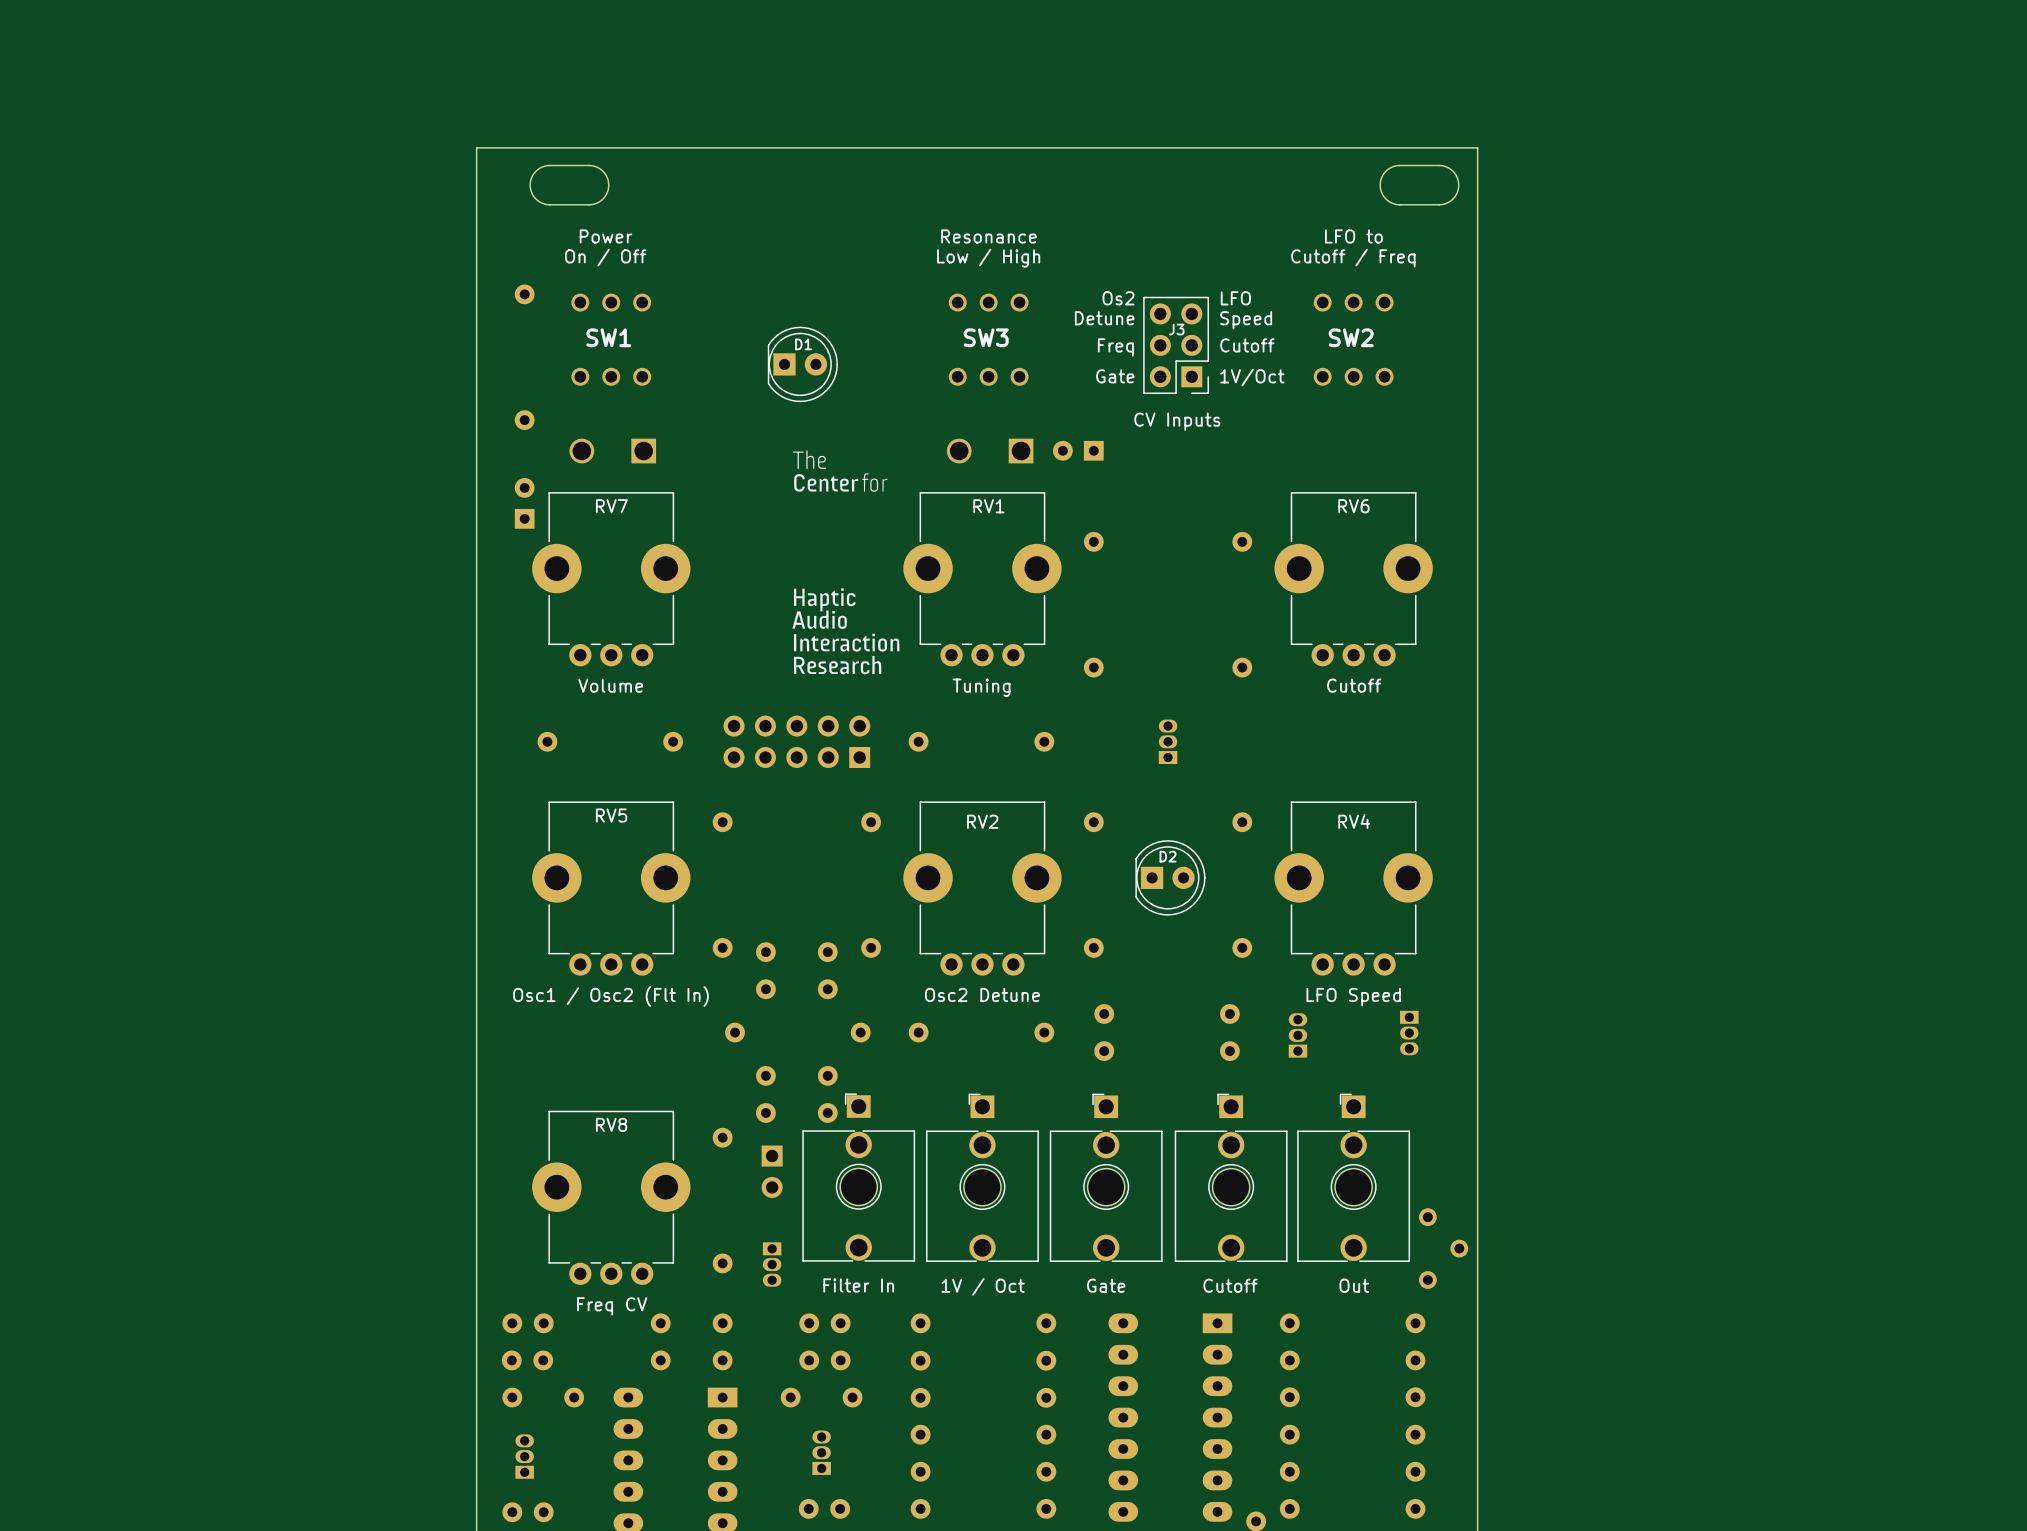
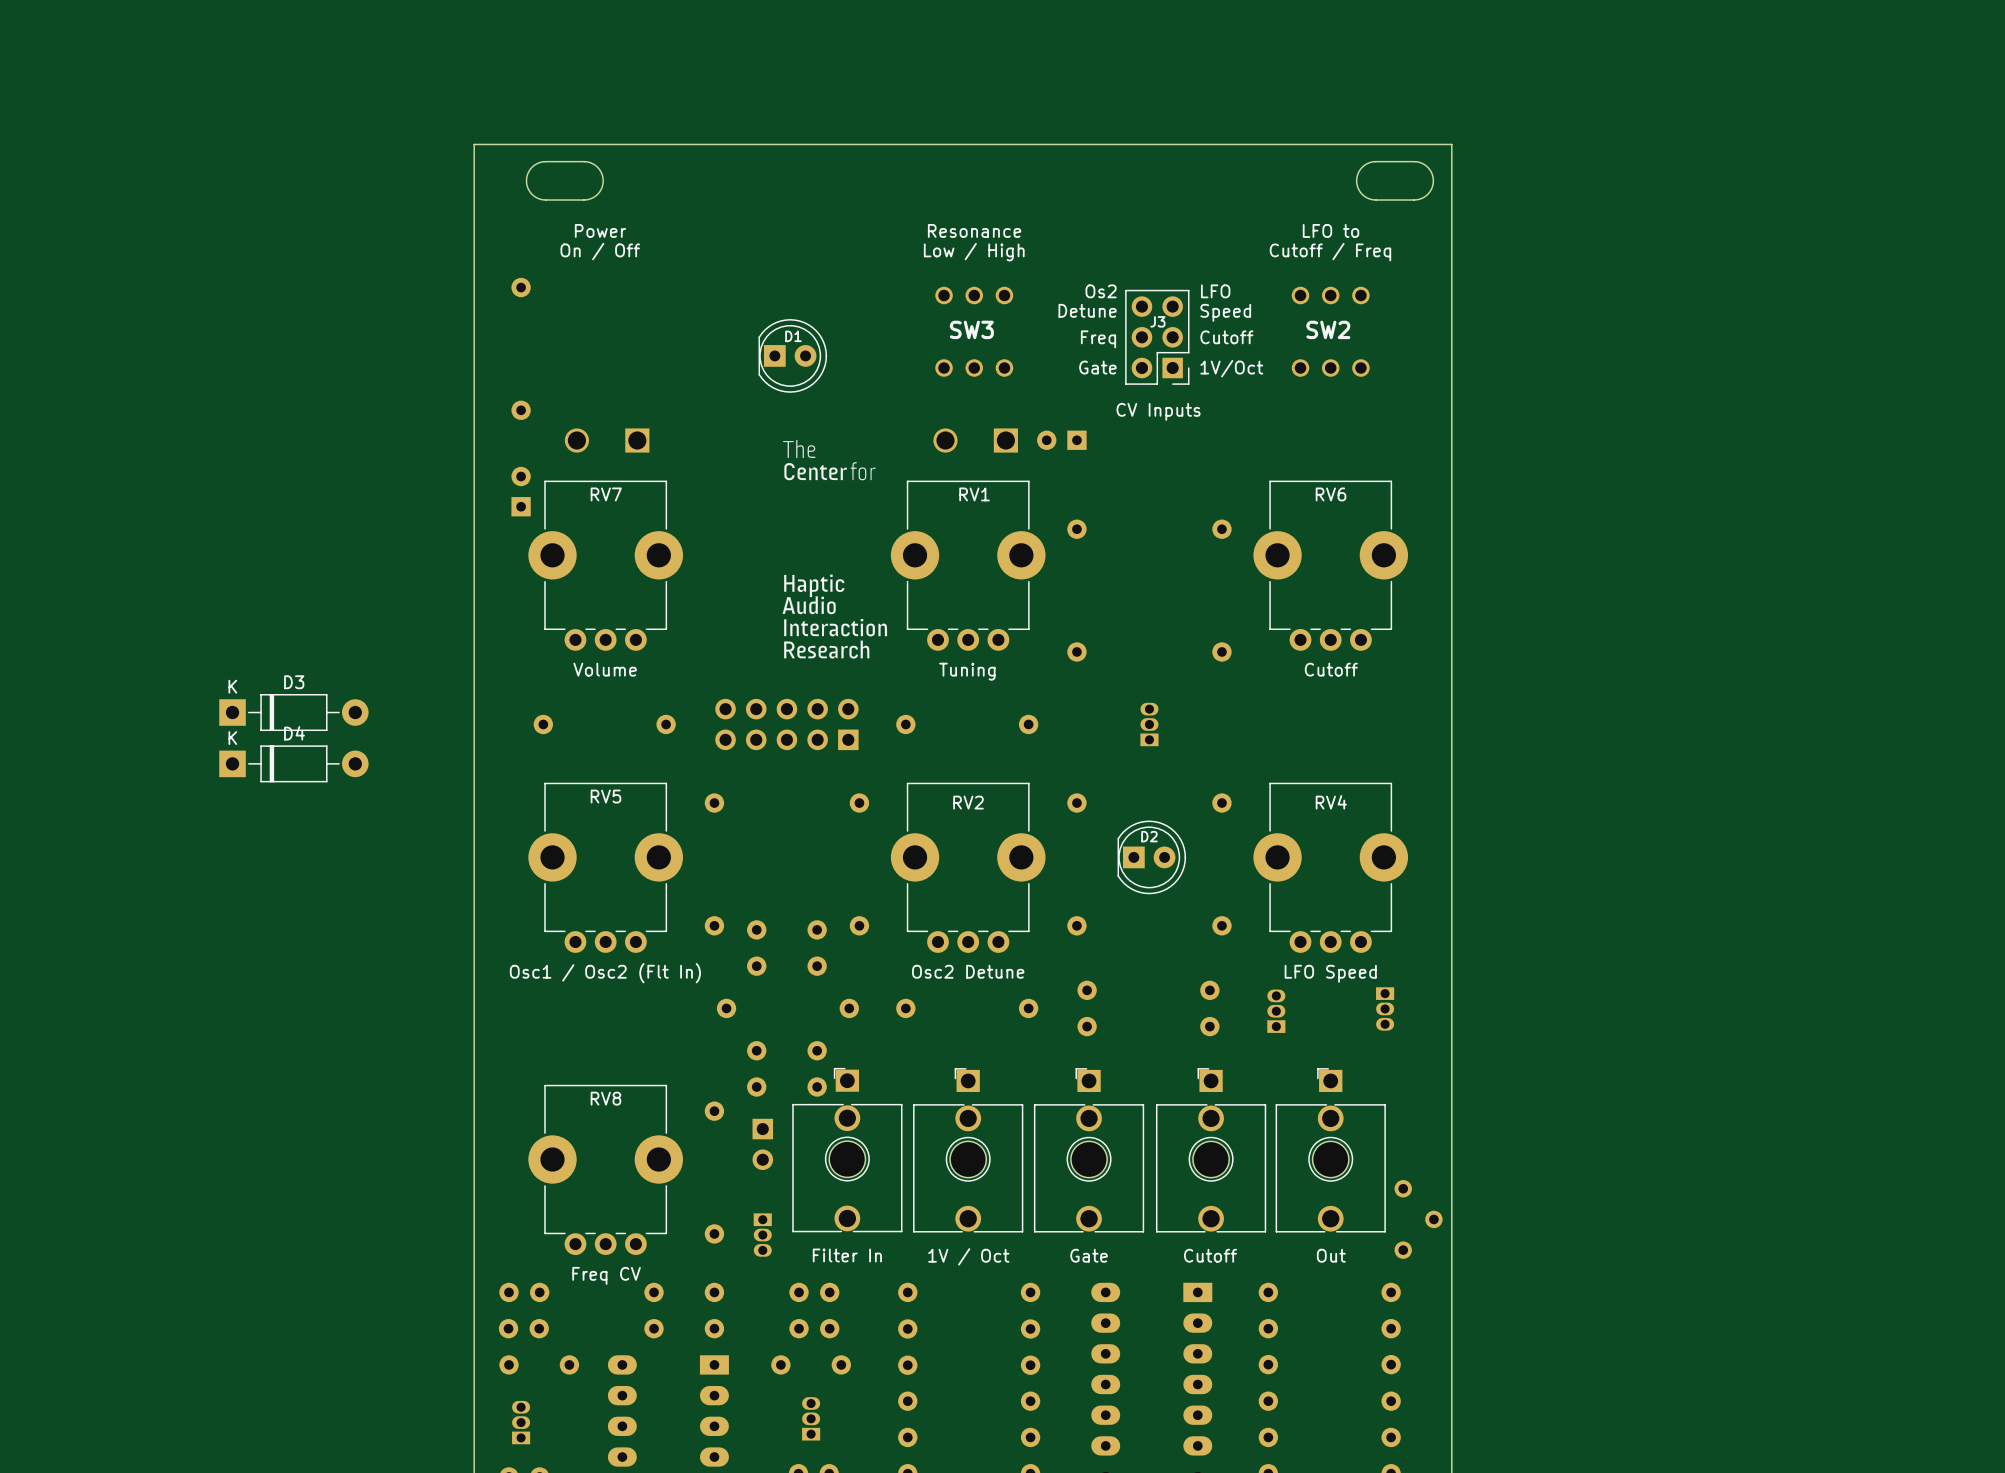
SW1: (611, 339) -> none
D3: none -> (293, 712)
D4: none -> (293, 763)

